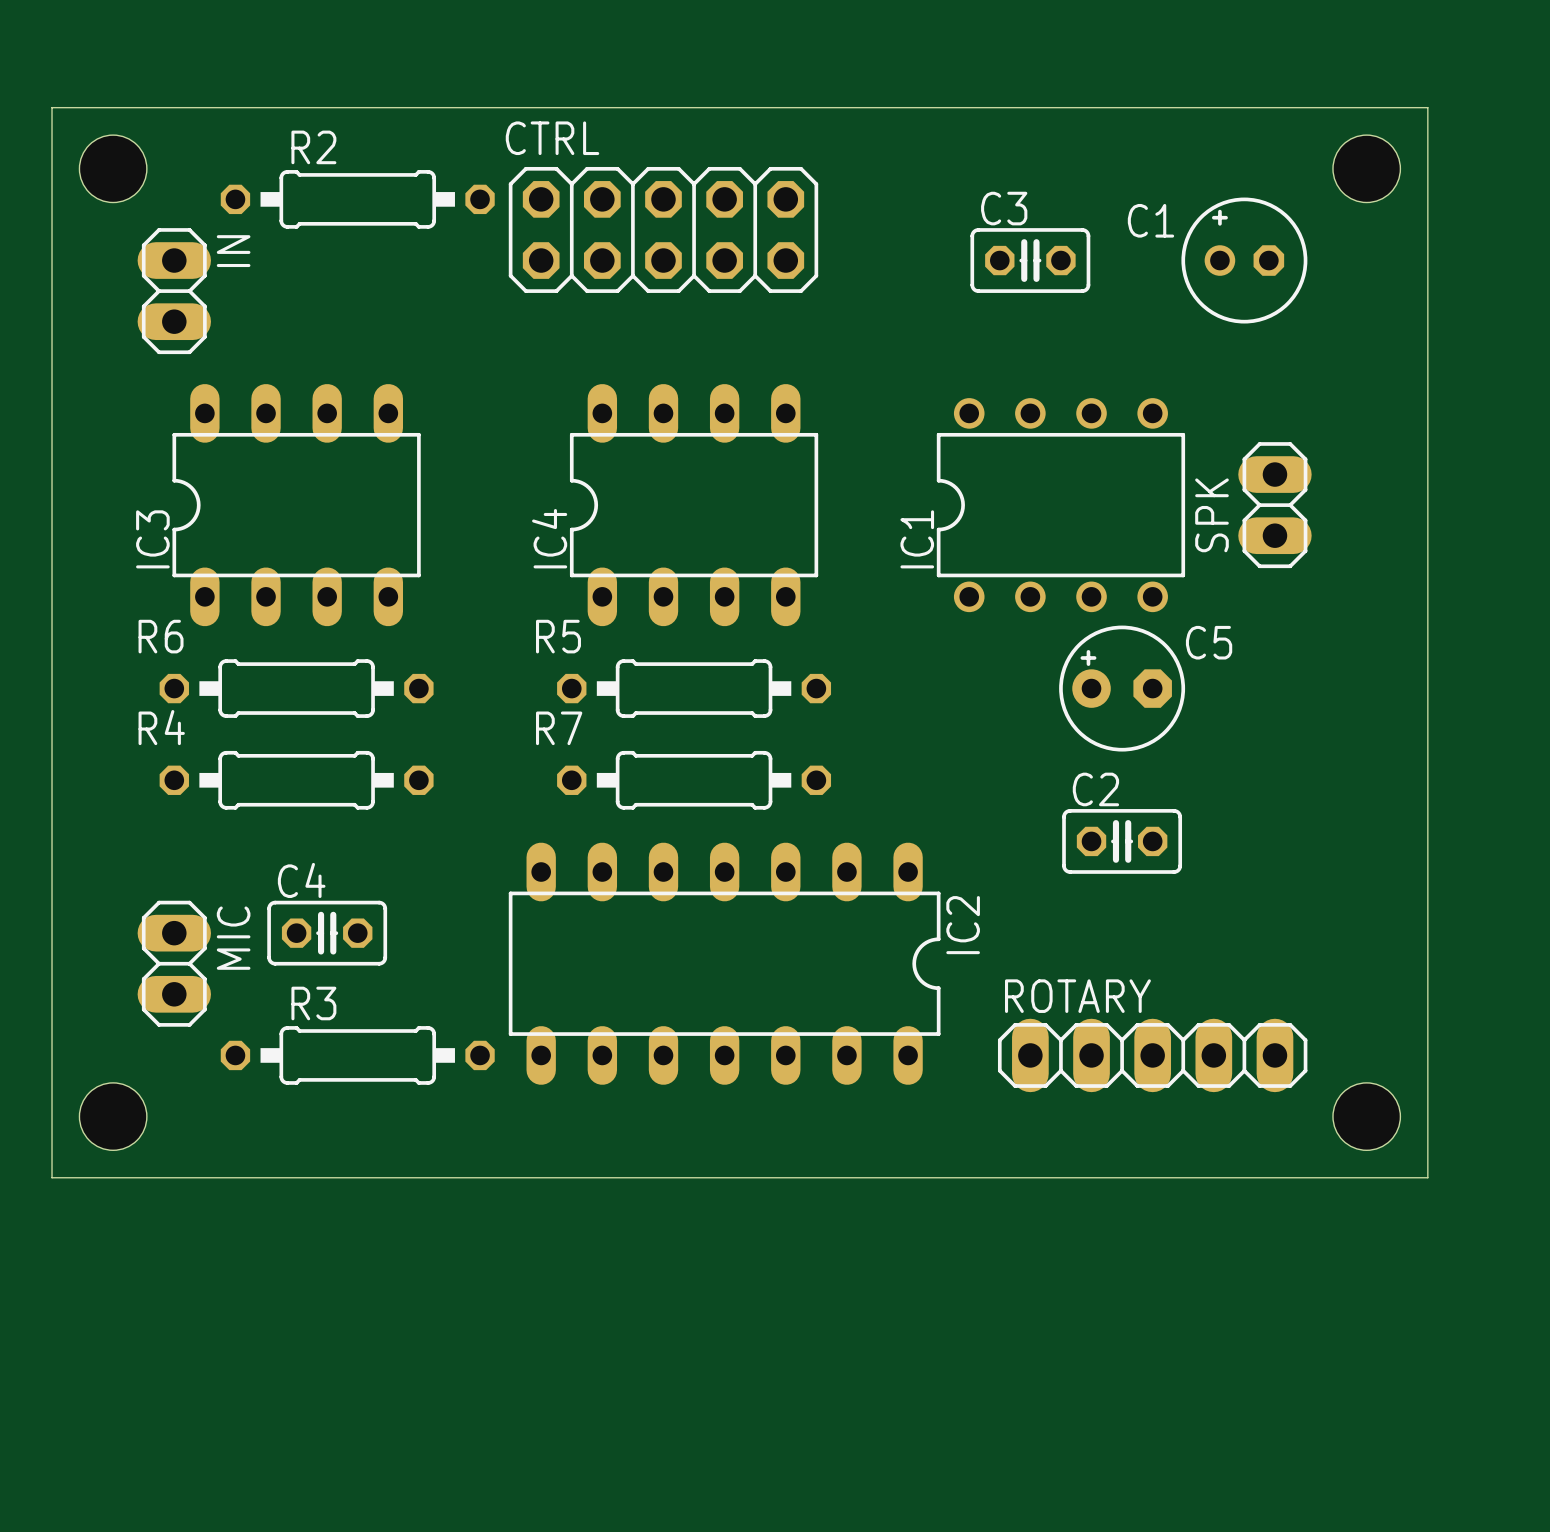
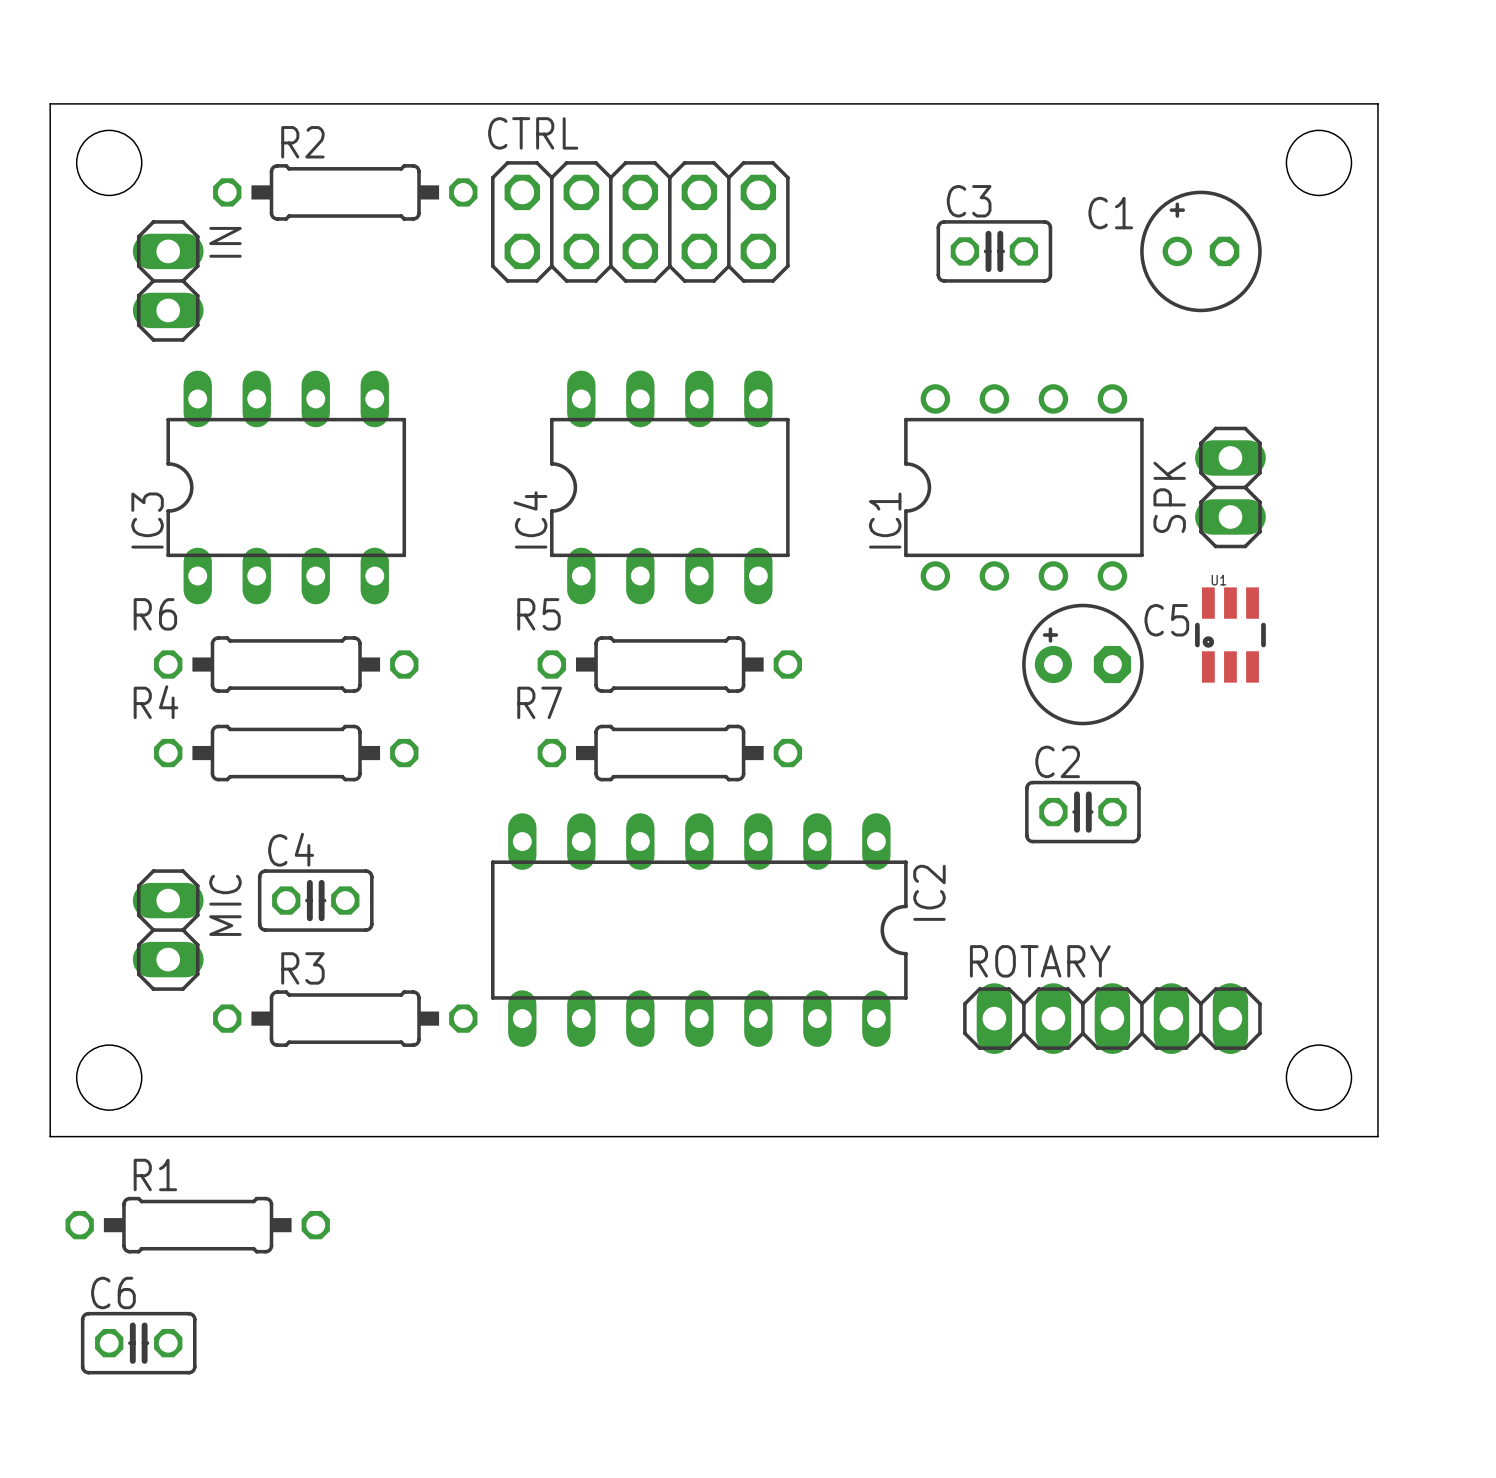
U1: none -> (1230, 635)
R1: none -> (197, 1225)
C6: none -> (138, 1343)

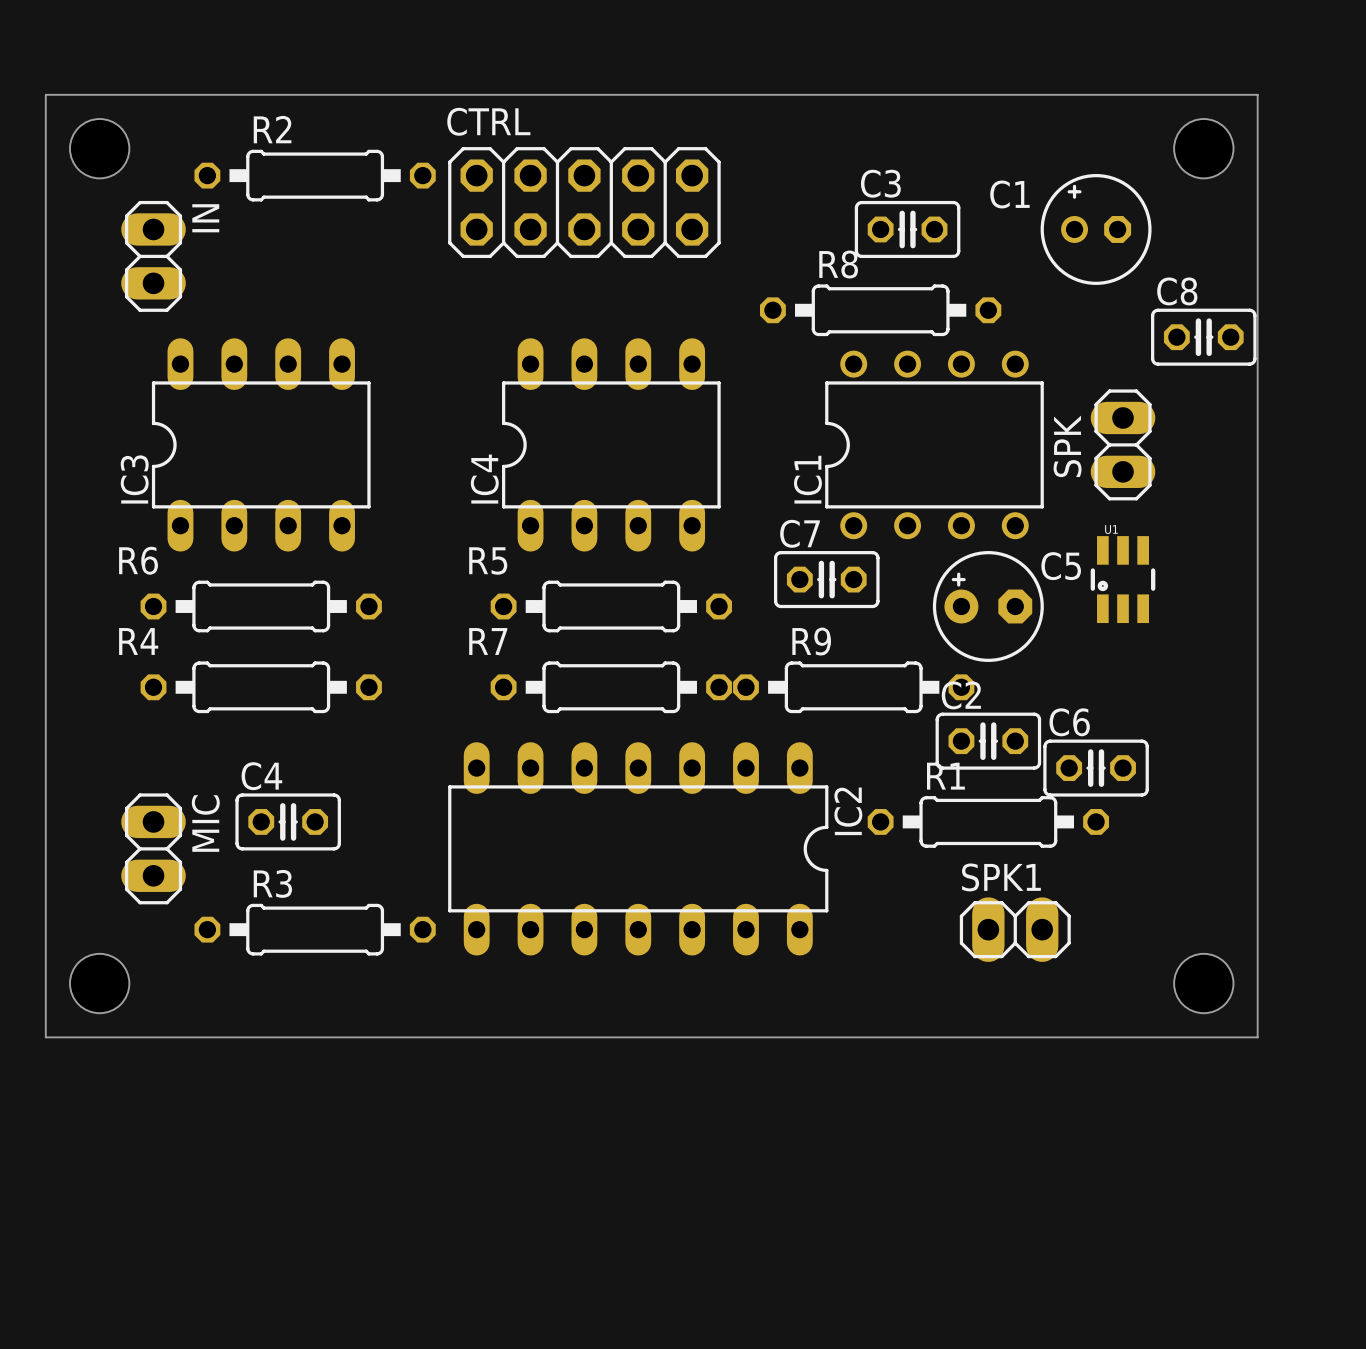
R8: none -> (880, 310)
C8: none -> (1203, 337)
C7: none -> (826, 579)
R9: none -> (853, 687)
ROTARY: (1112, 1018) -> none
SPK1: none -> (1015, 929)
R1 position: (197, 1225) -> (988, 821)
C6 position: (138, 1343) -> (1096, 768)

